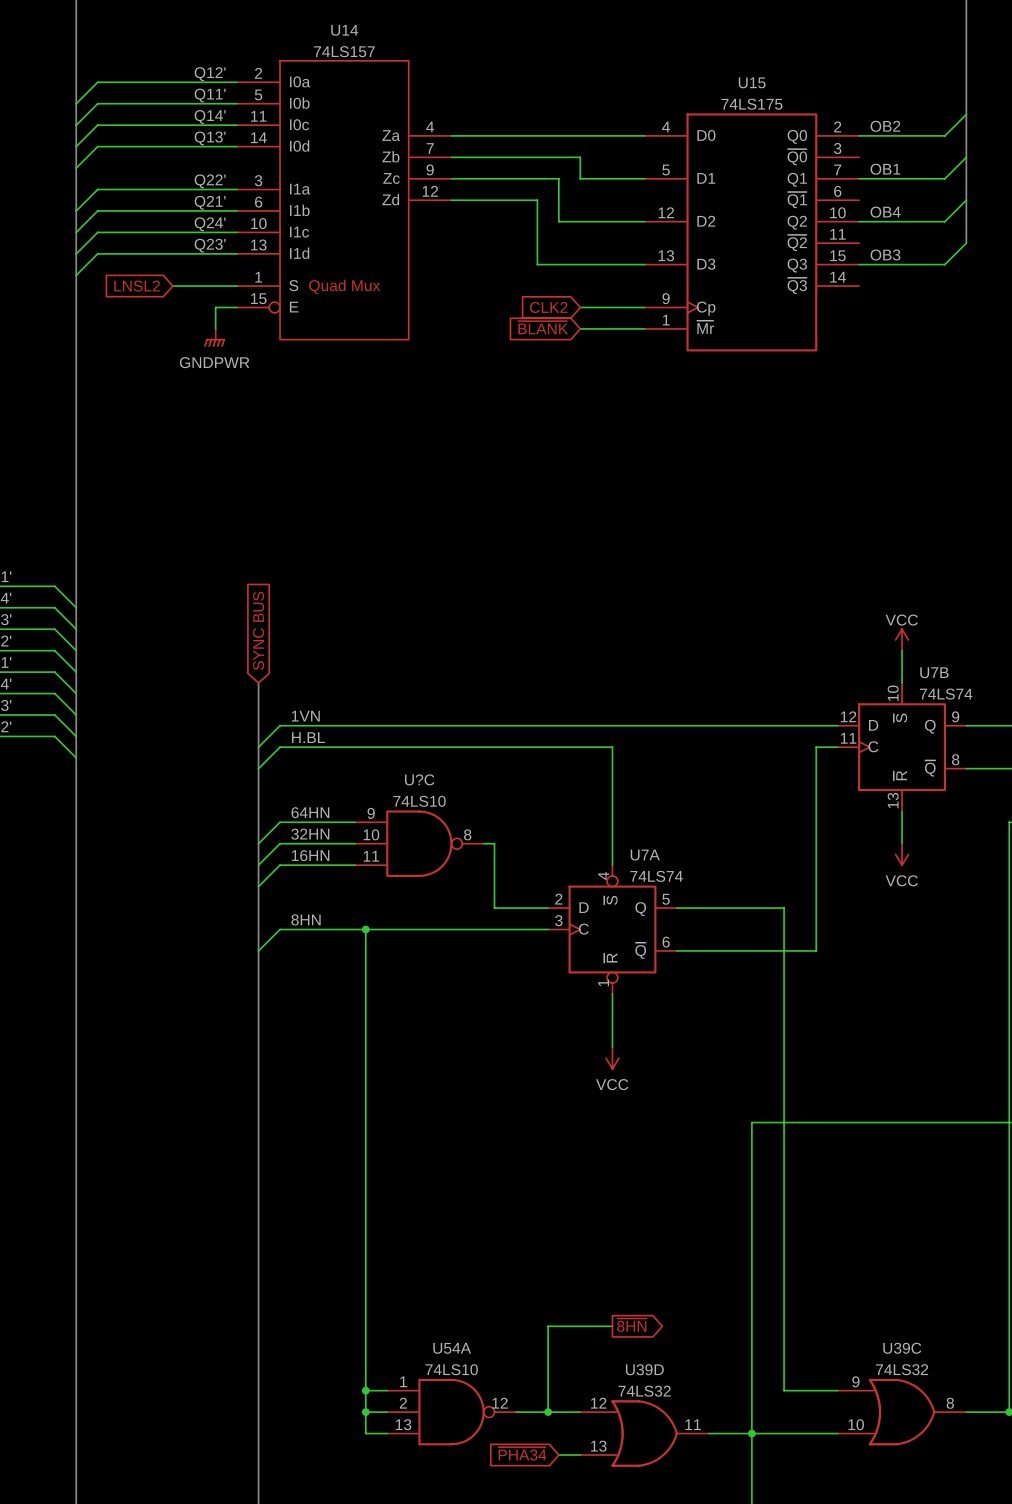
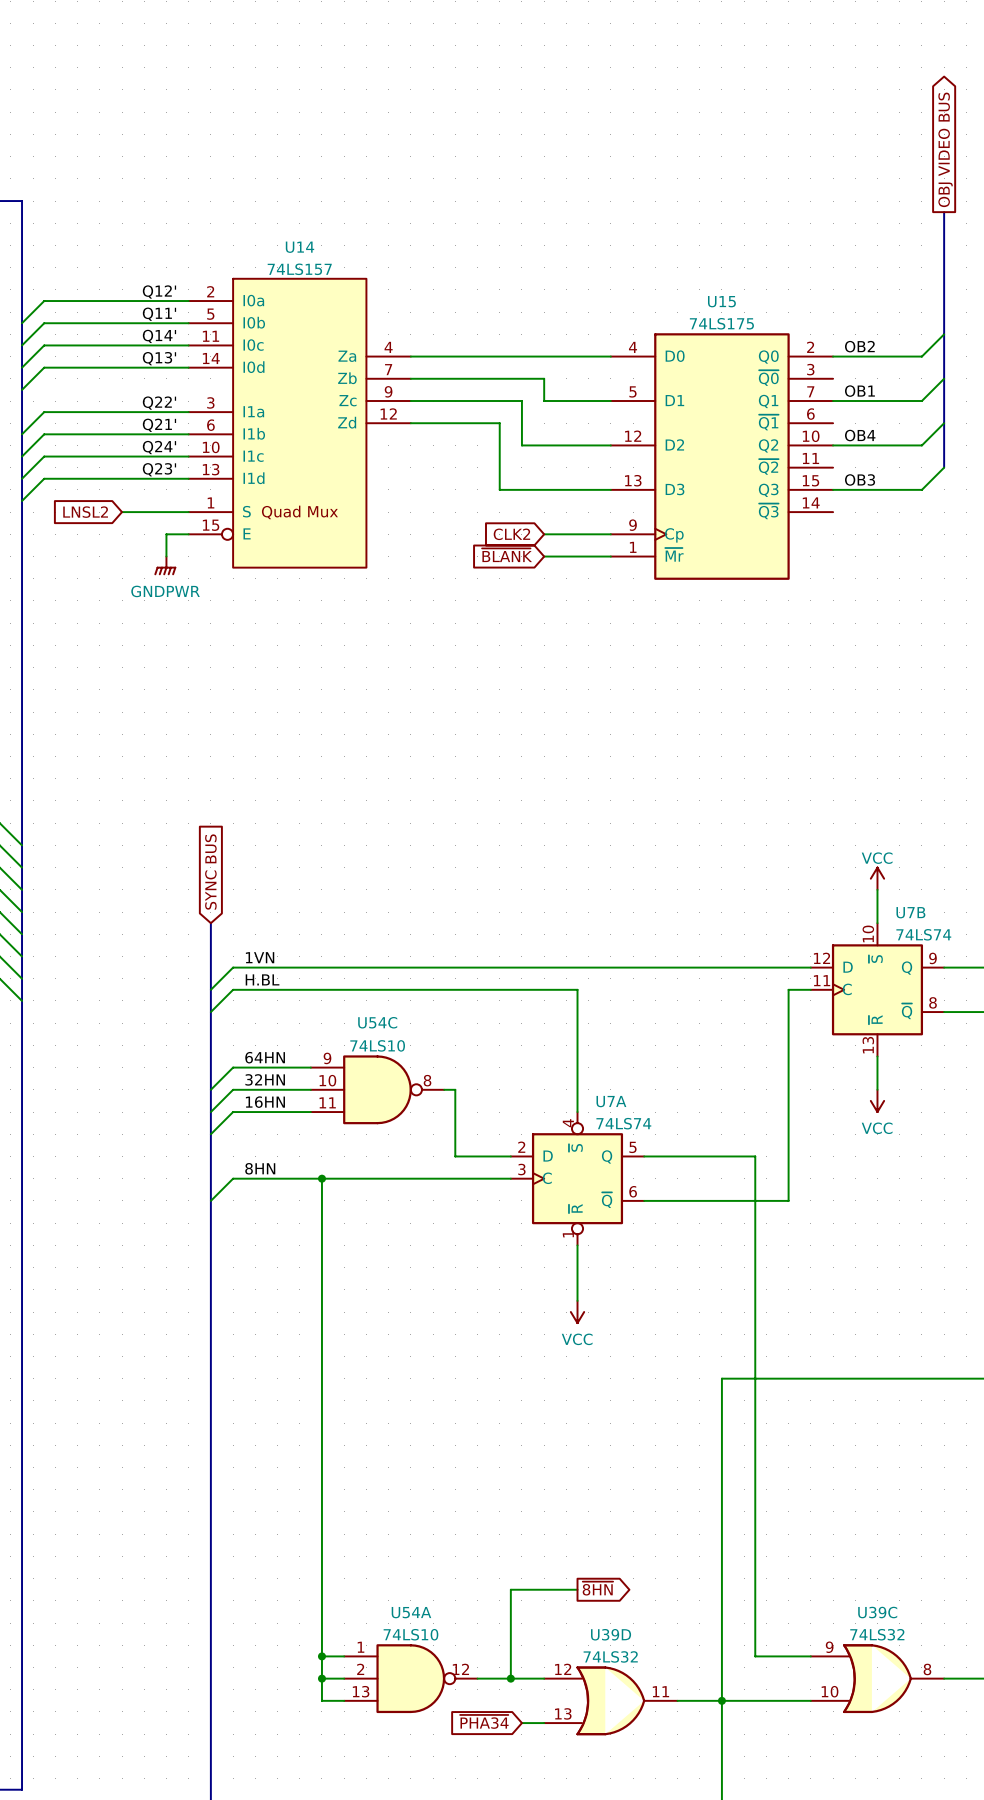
U?C name: U?C (419, 779) -> U54C (377, 1022)

